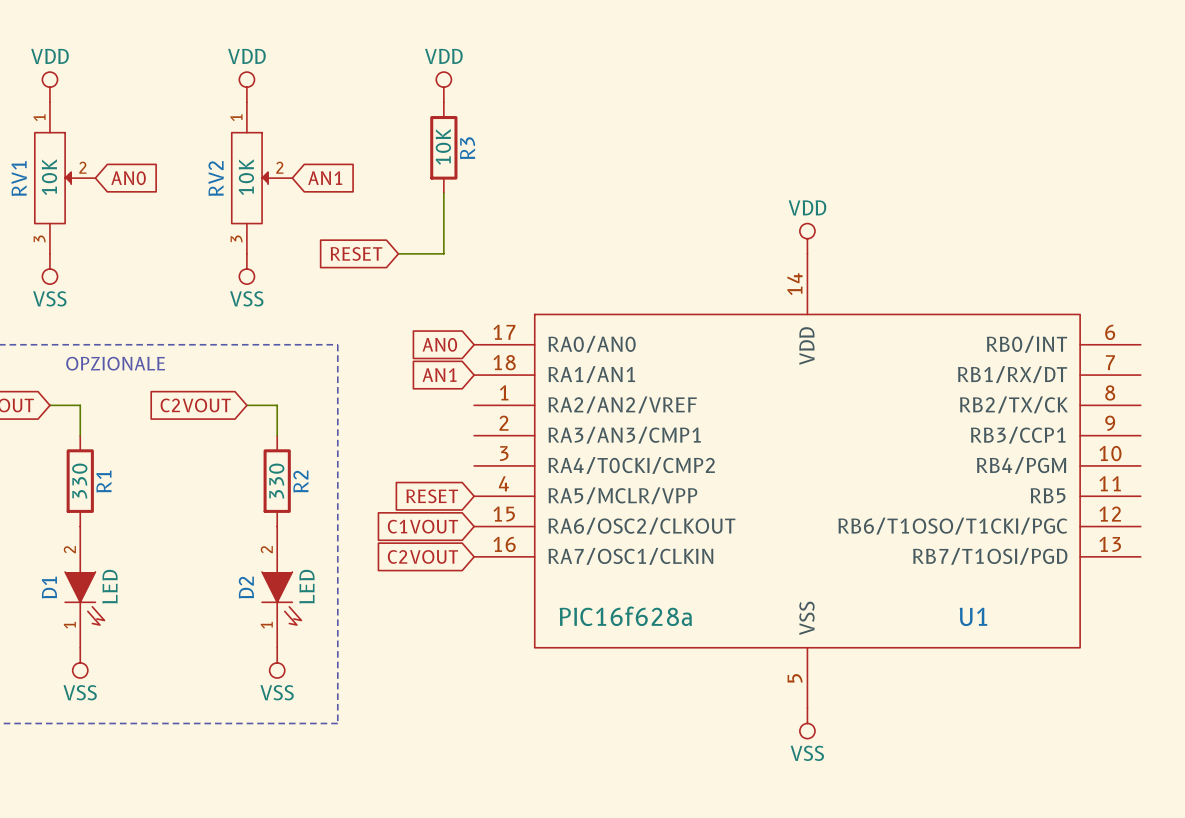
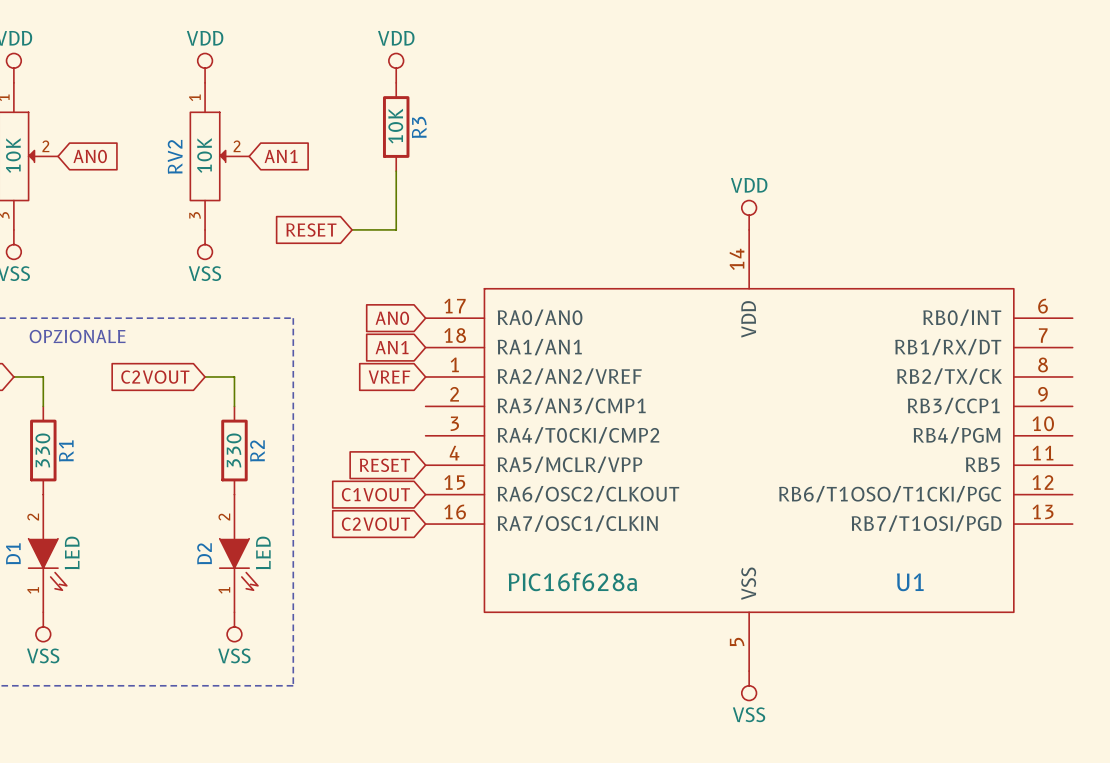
global label: none -> VREF (389, 377)

